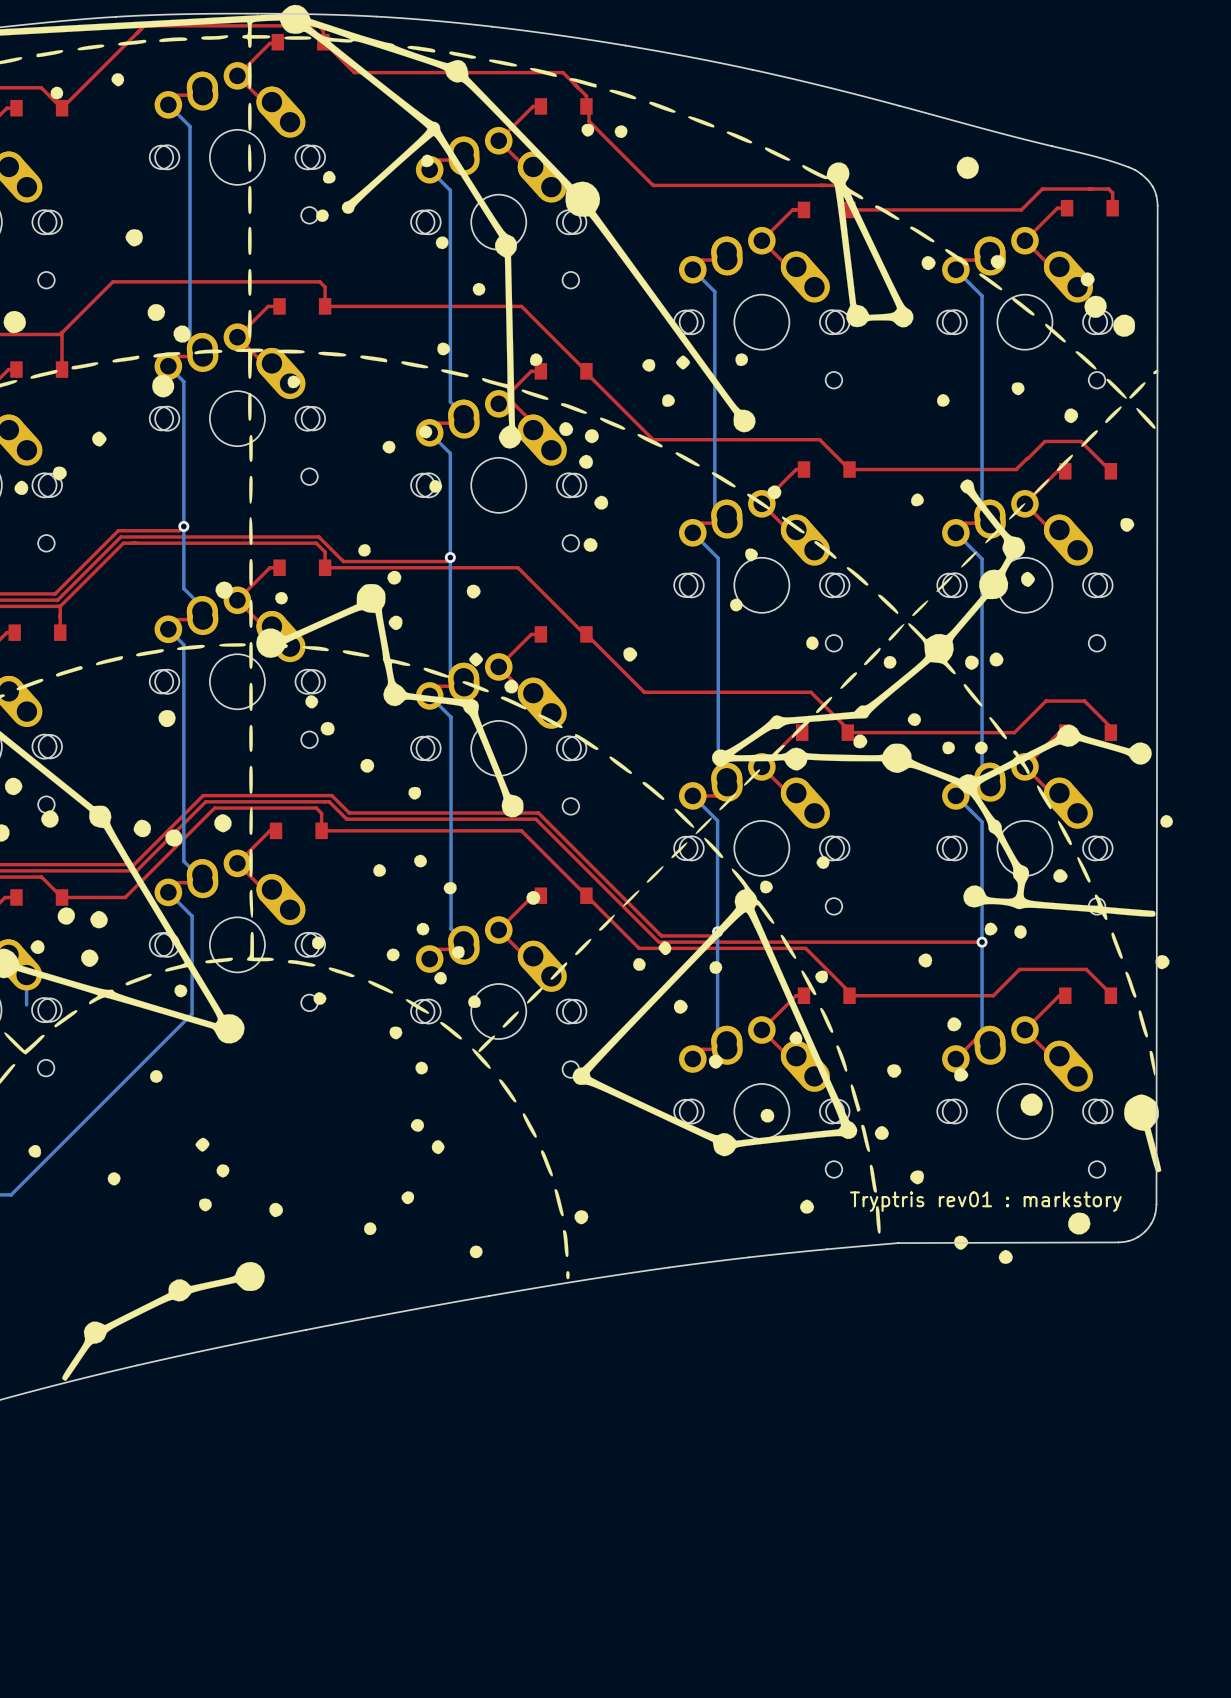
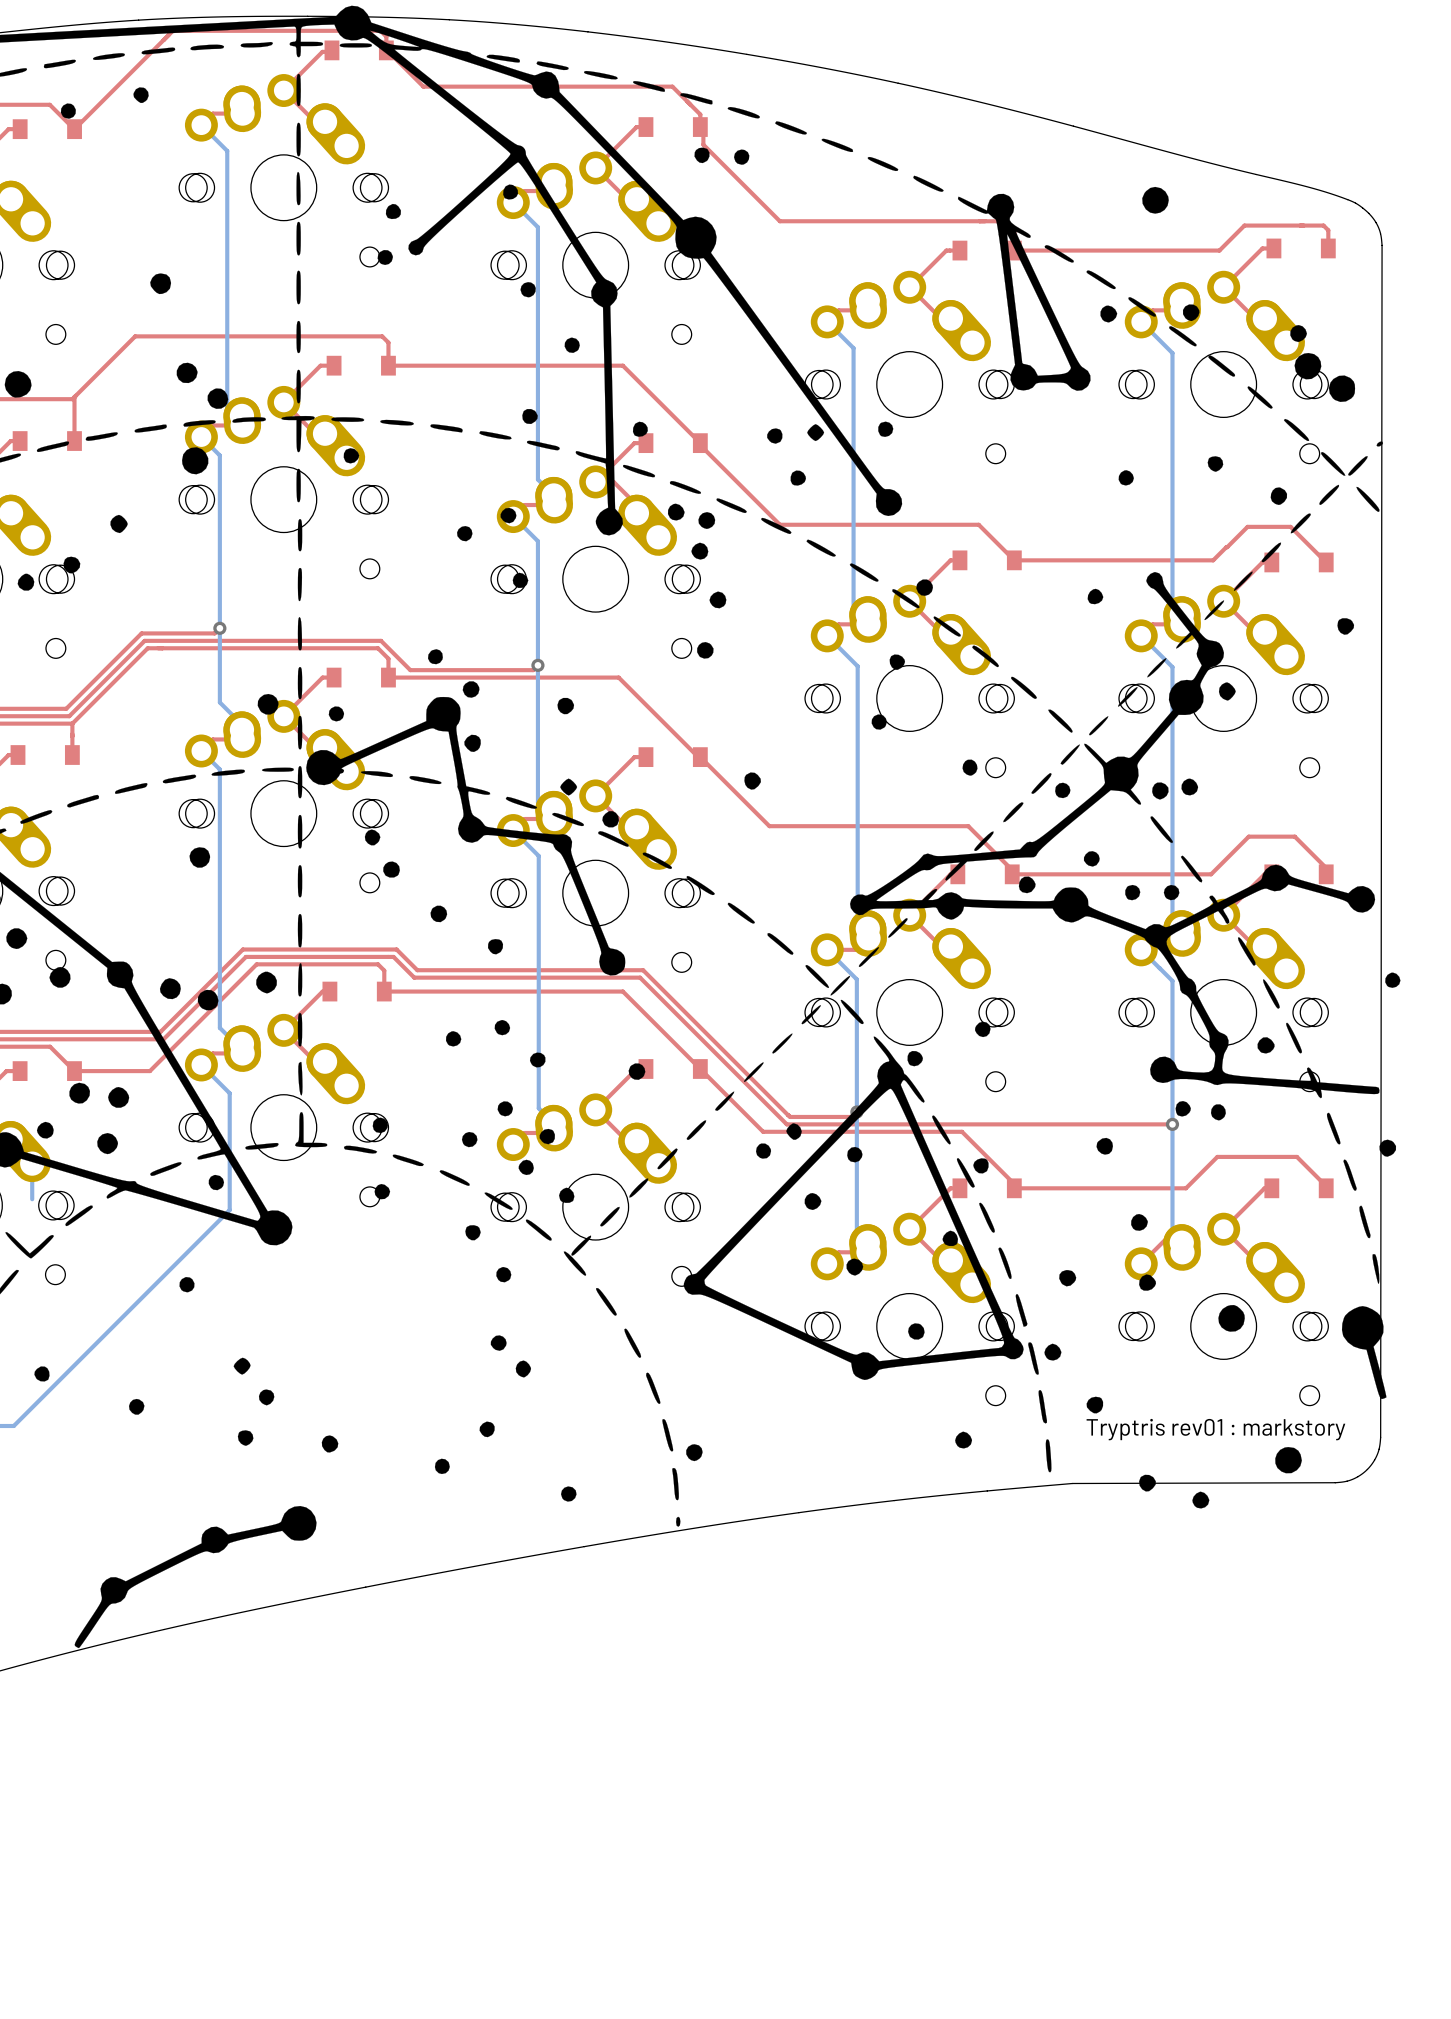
text position: Tryptris rev01 : markstory (985, 1201) -> Tryptris rev01 : markstory (1215, 1429)

